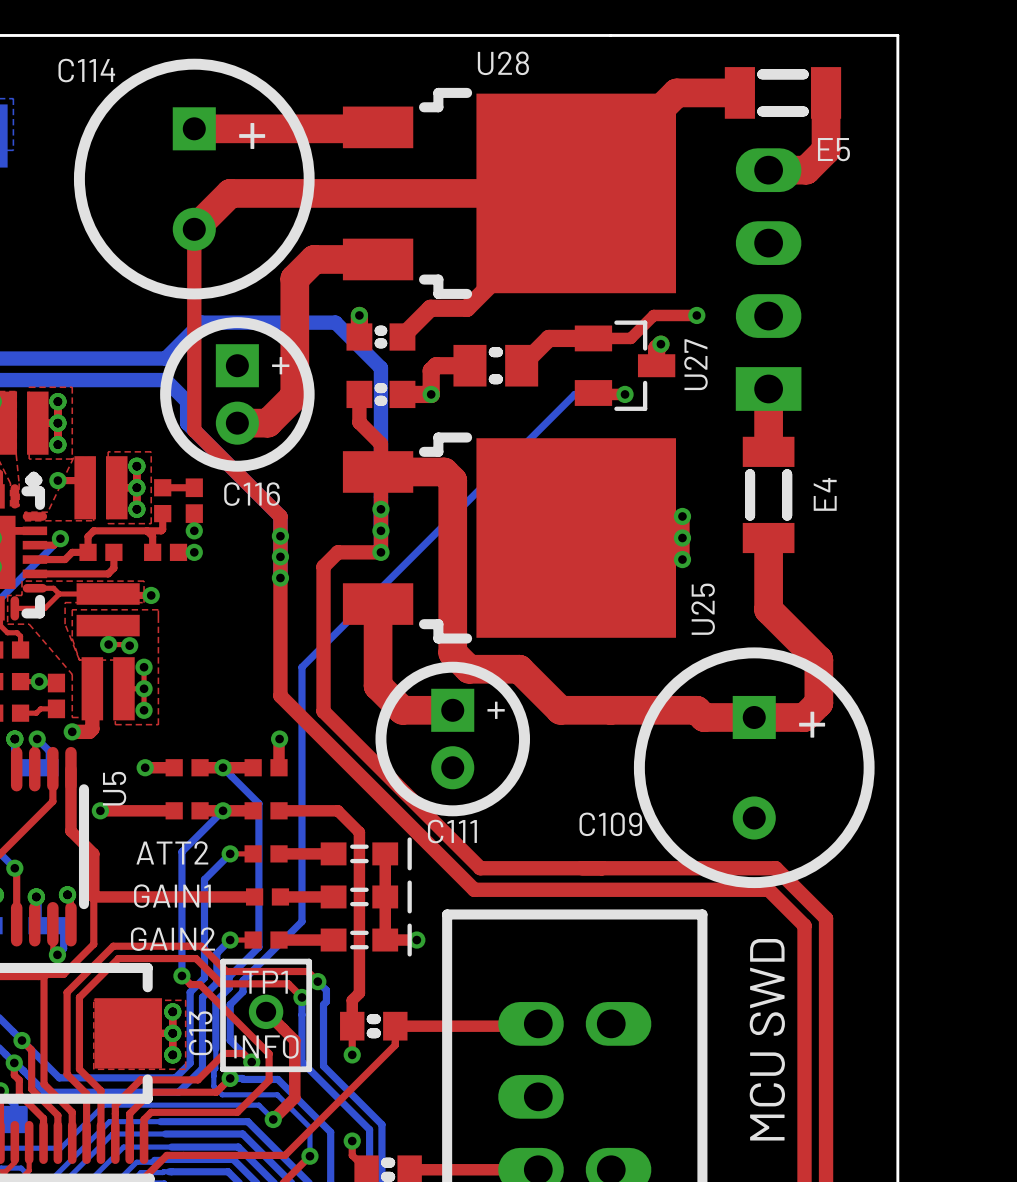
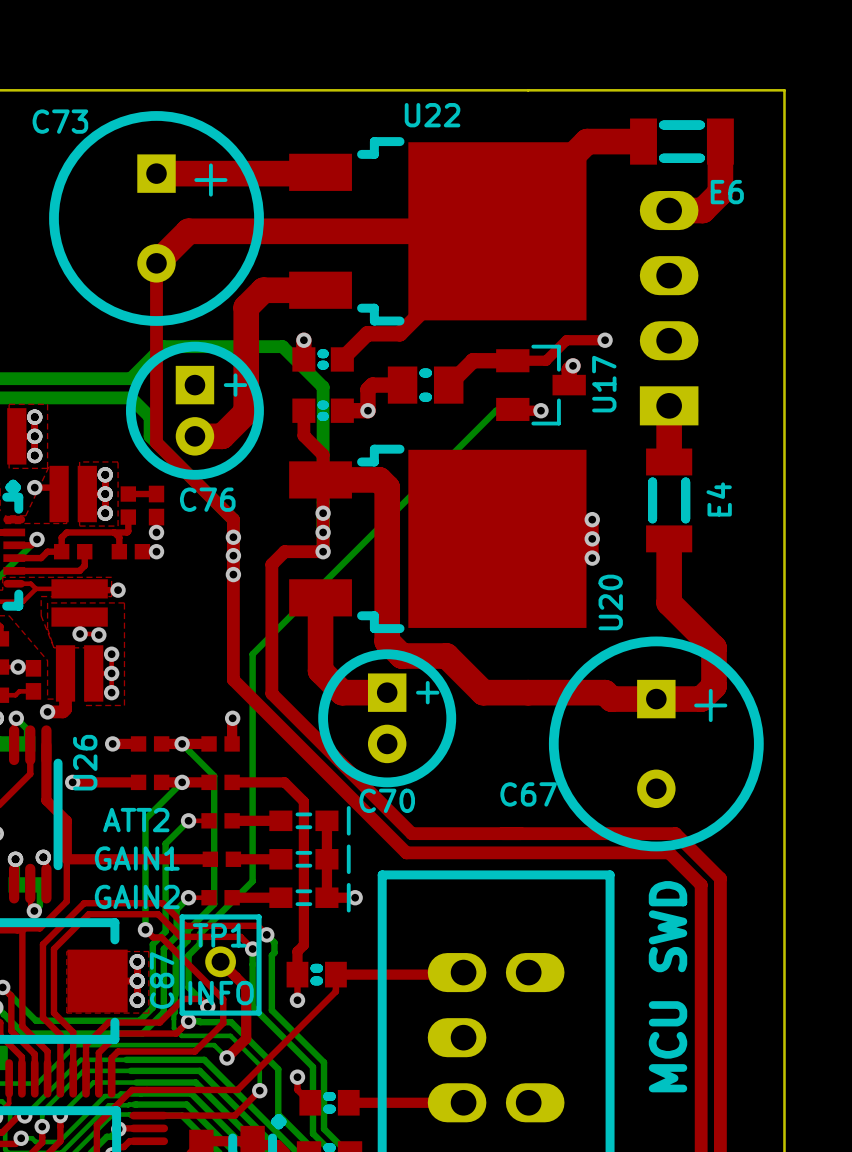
U28 name: U28 (503, 63) -> U22 (432, 115)
C114 name: C114 (86, 70) -> C73 (60, 121)
E5 name: E5 (833, 149) -> E6 (727, 192)
U27 name: U27 (695, 364) -> U17 (604, 384)
C116 name: C116 (252, 494) -> C76 (207, 499)
U25 name: U25 (703, 609) -> U20 (610, 602)
U5 name: U5 (114, 788) -> U26 (85, 762)
C109 name: C109 (610, 824) -> C67 (528, 794)
C111 name: C111 (452, 831) -> C70 (387, 800)
C13 name: C13 (200, 1033) -> C87 (162, 980)

